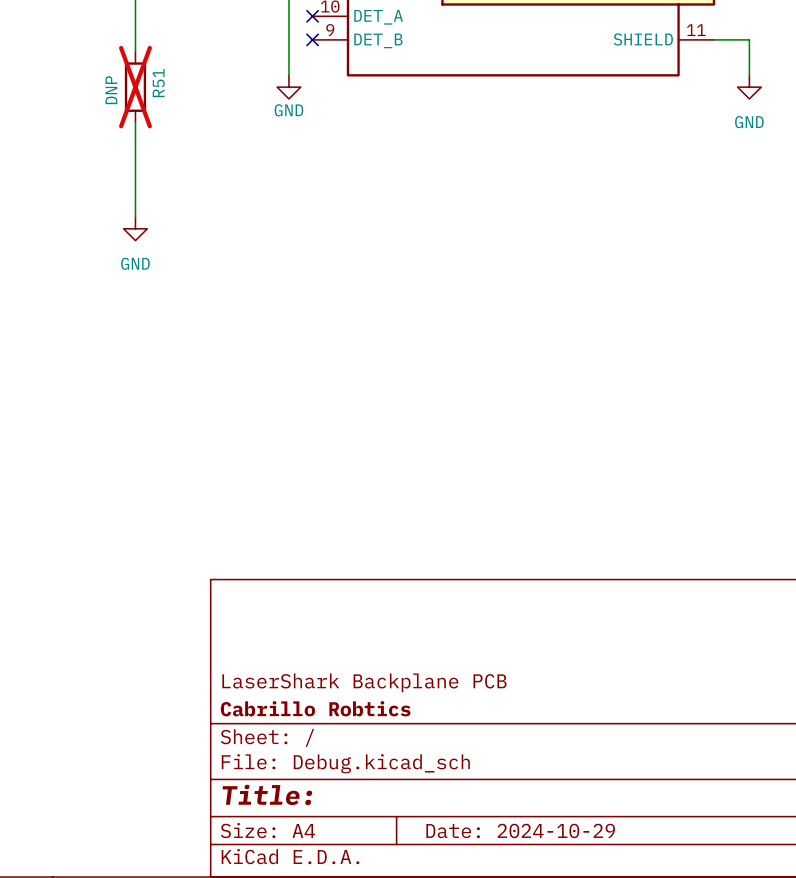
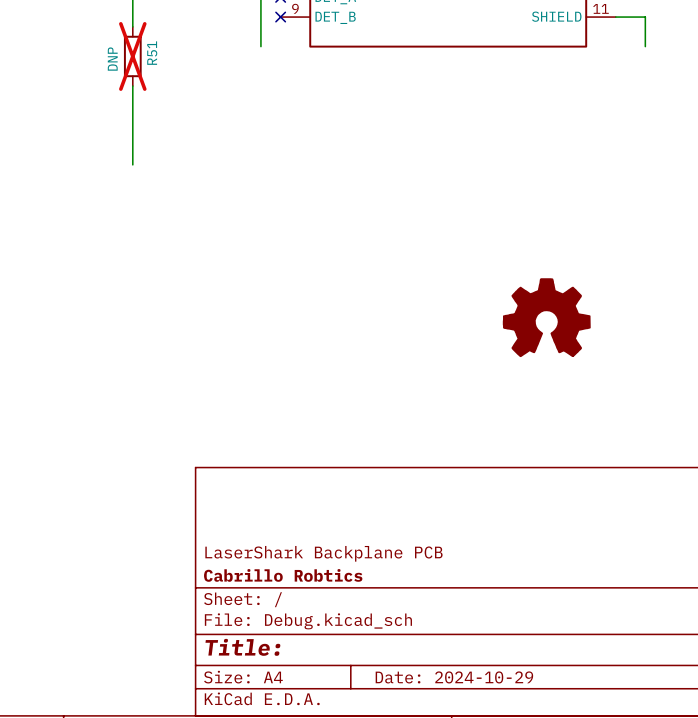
power symbol: GND (288, 87) -> none
power symbol: GND (749, 87) -> none
power symbol: GND (135, 228) -> none
power symbol: none -> (546, 317)

